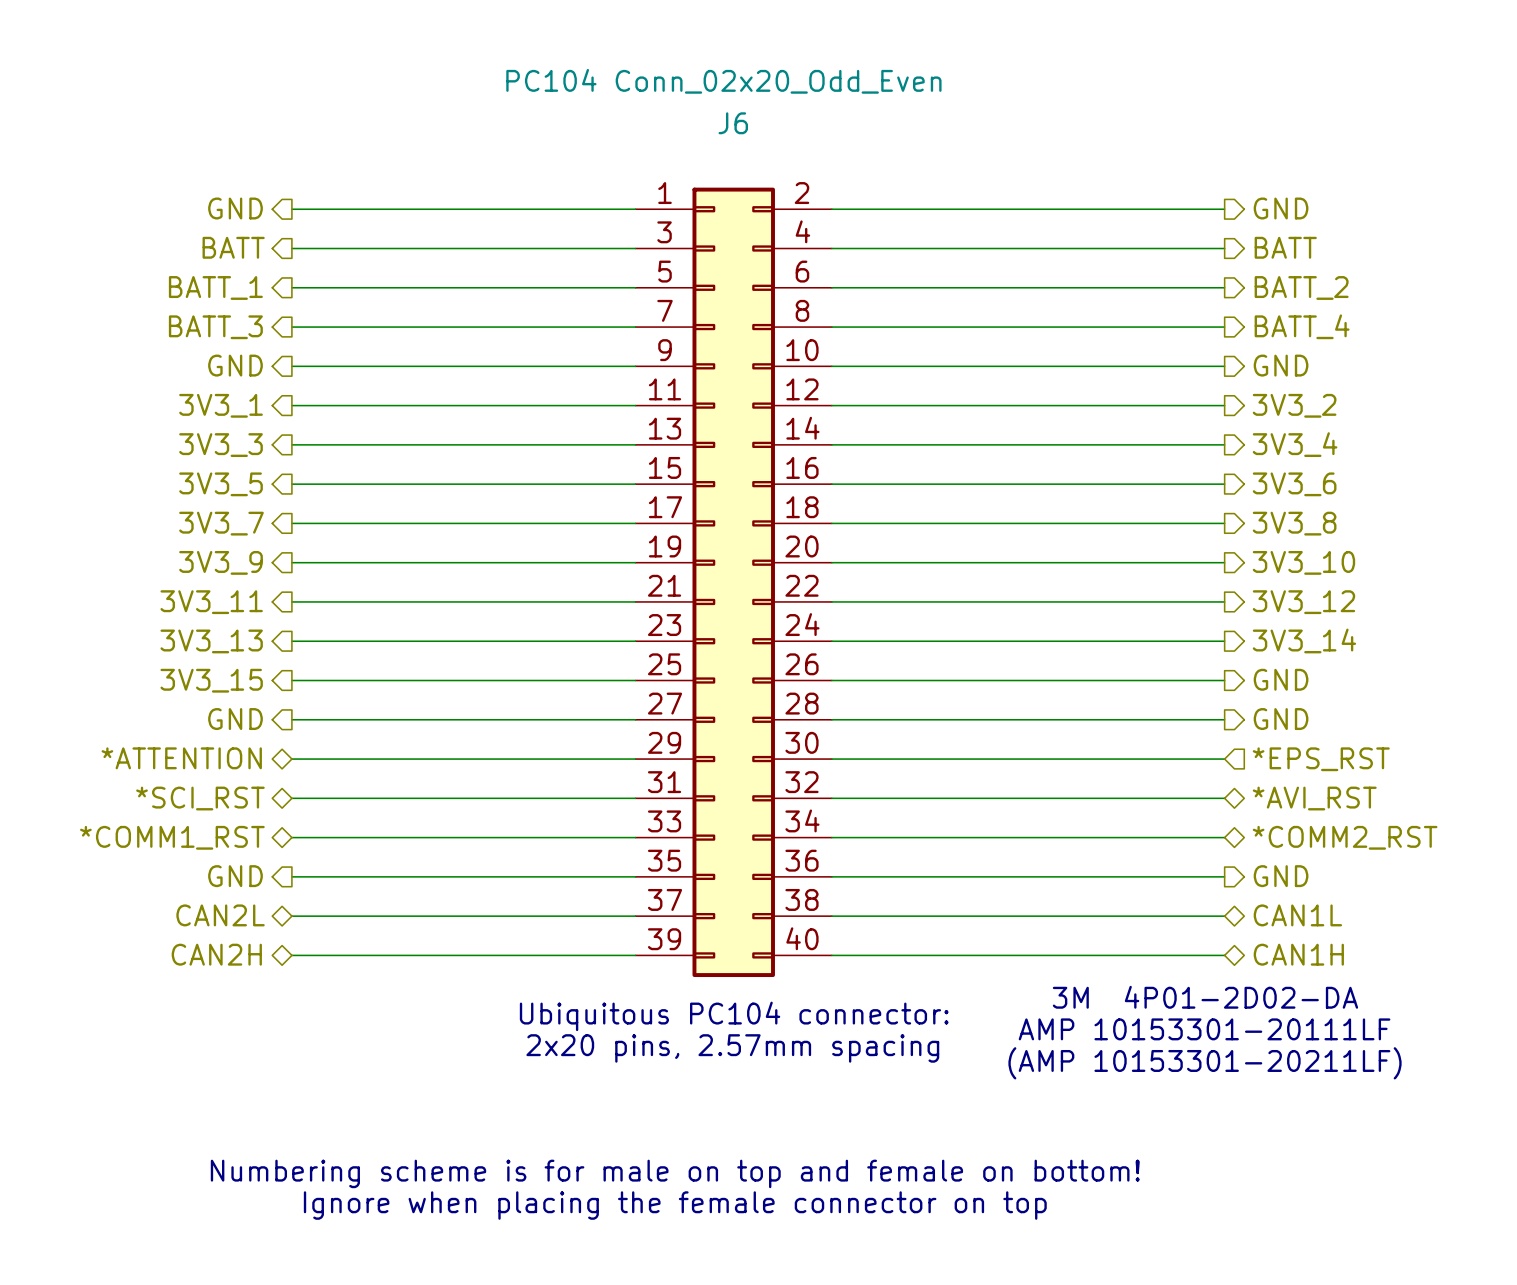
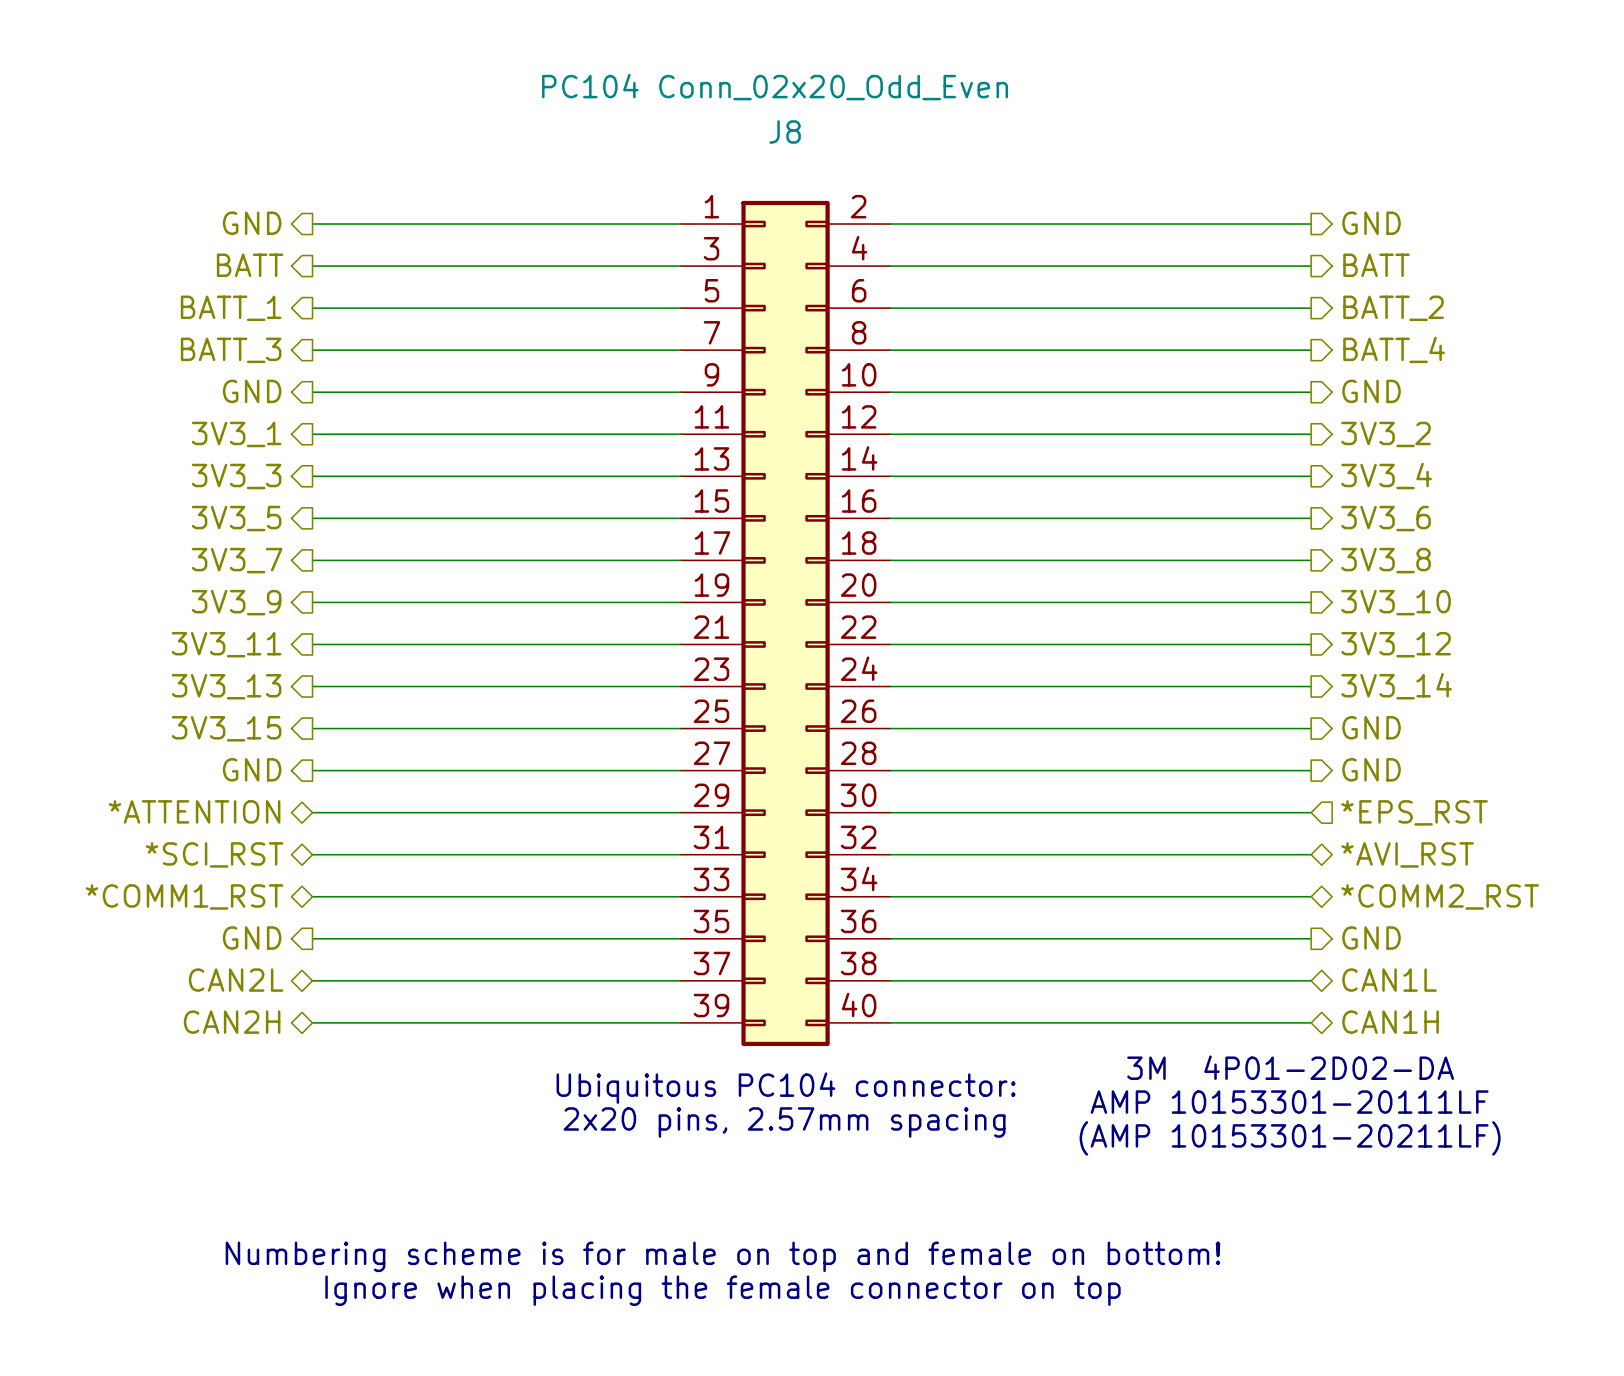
J6 name: J6 (733, 123) -> J8 (785, 131)

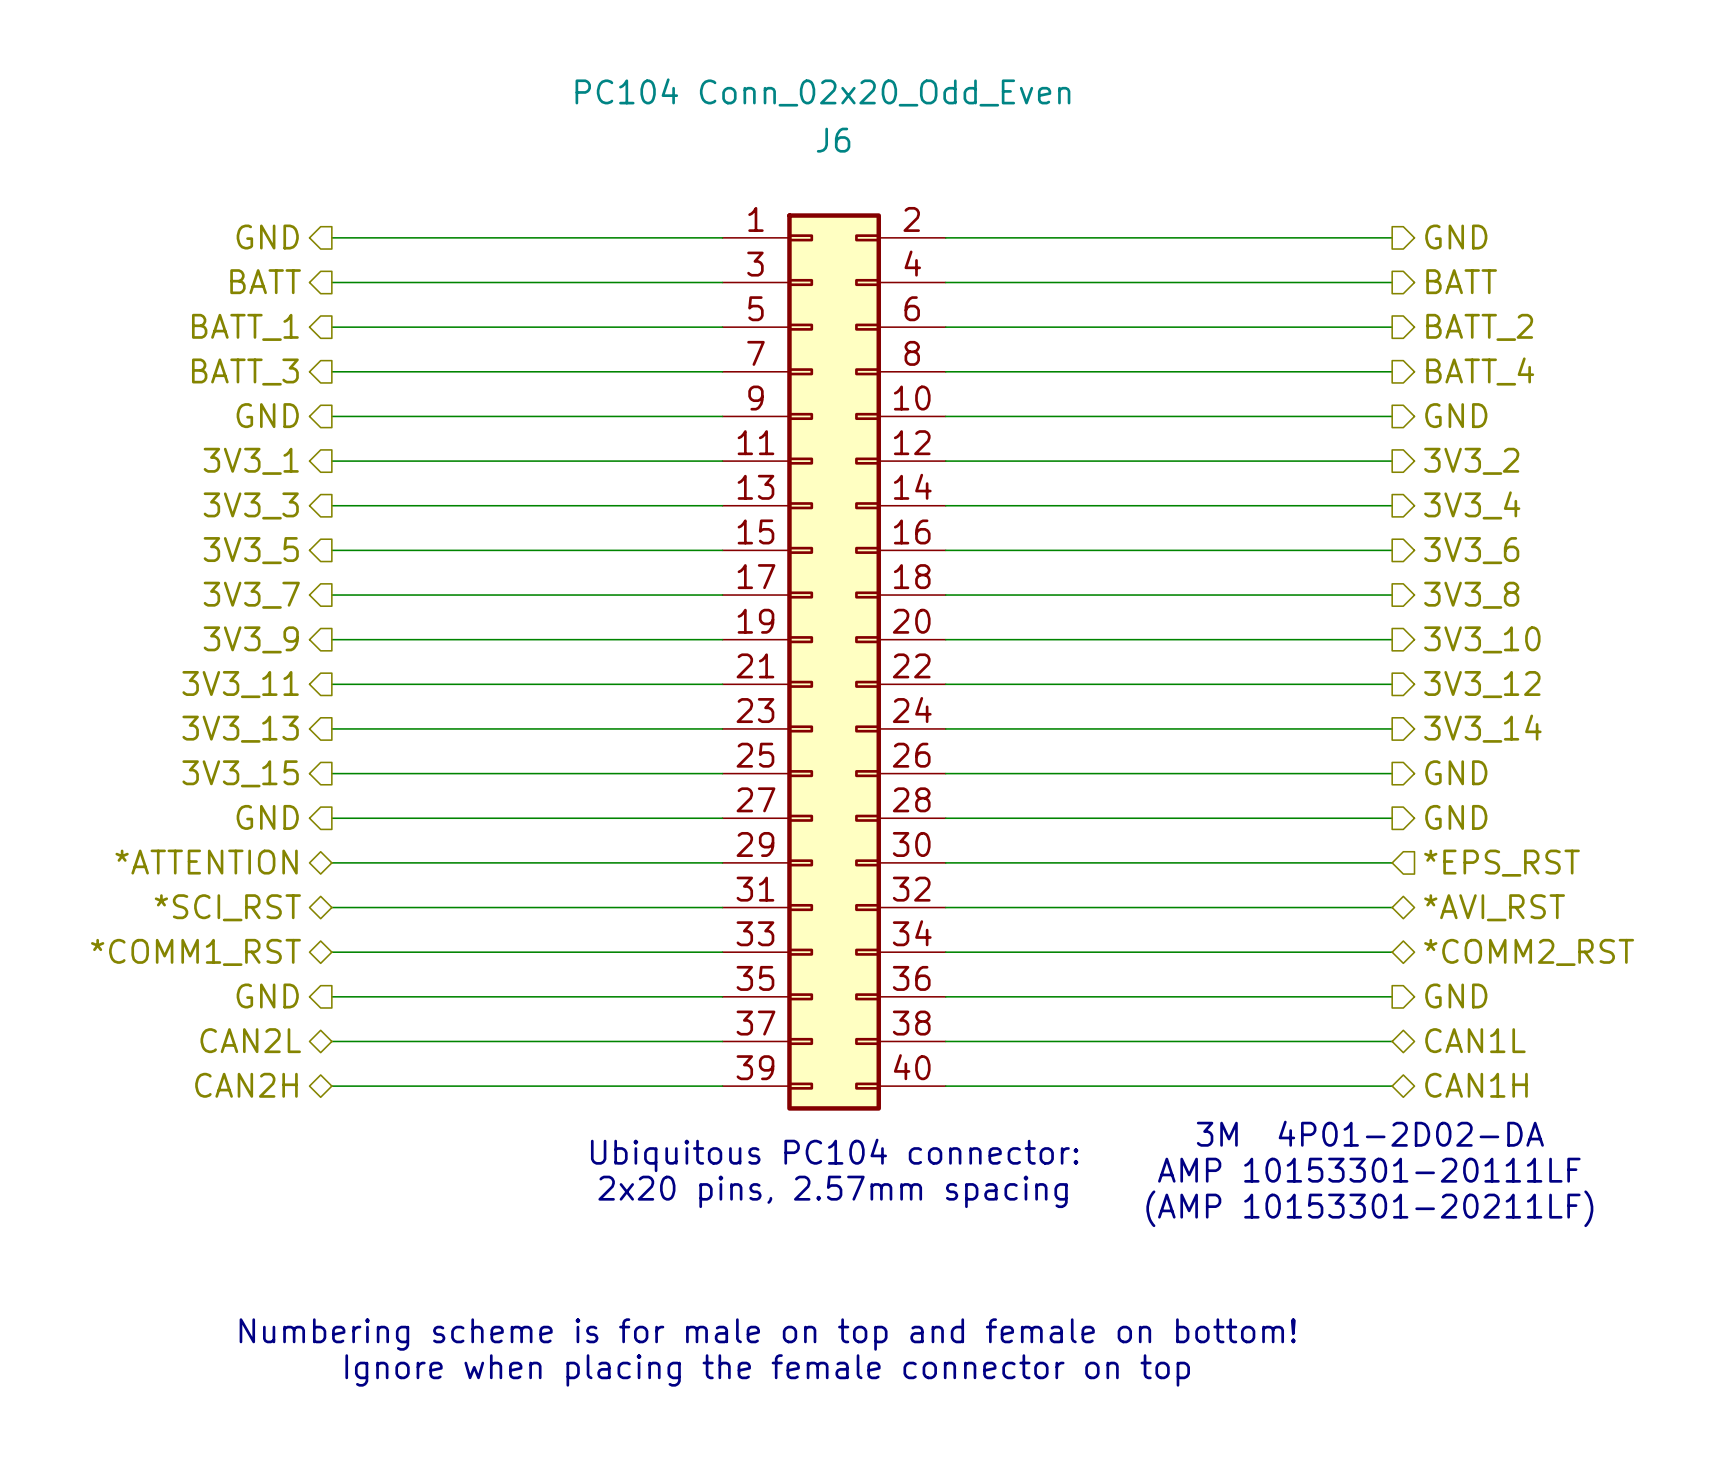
J8 name: J8 (785, 131) -> J6 (833, 140)

